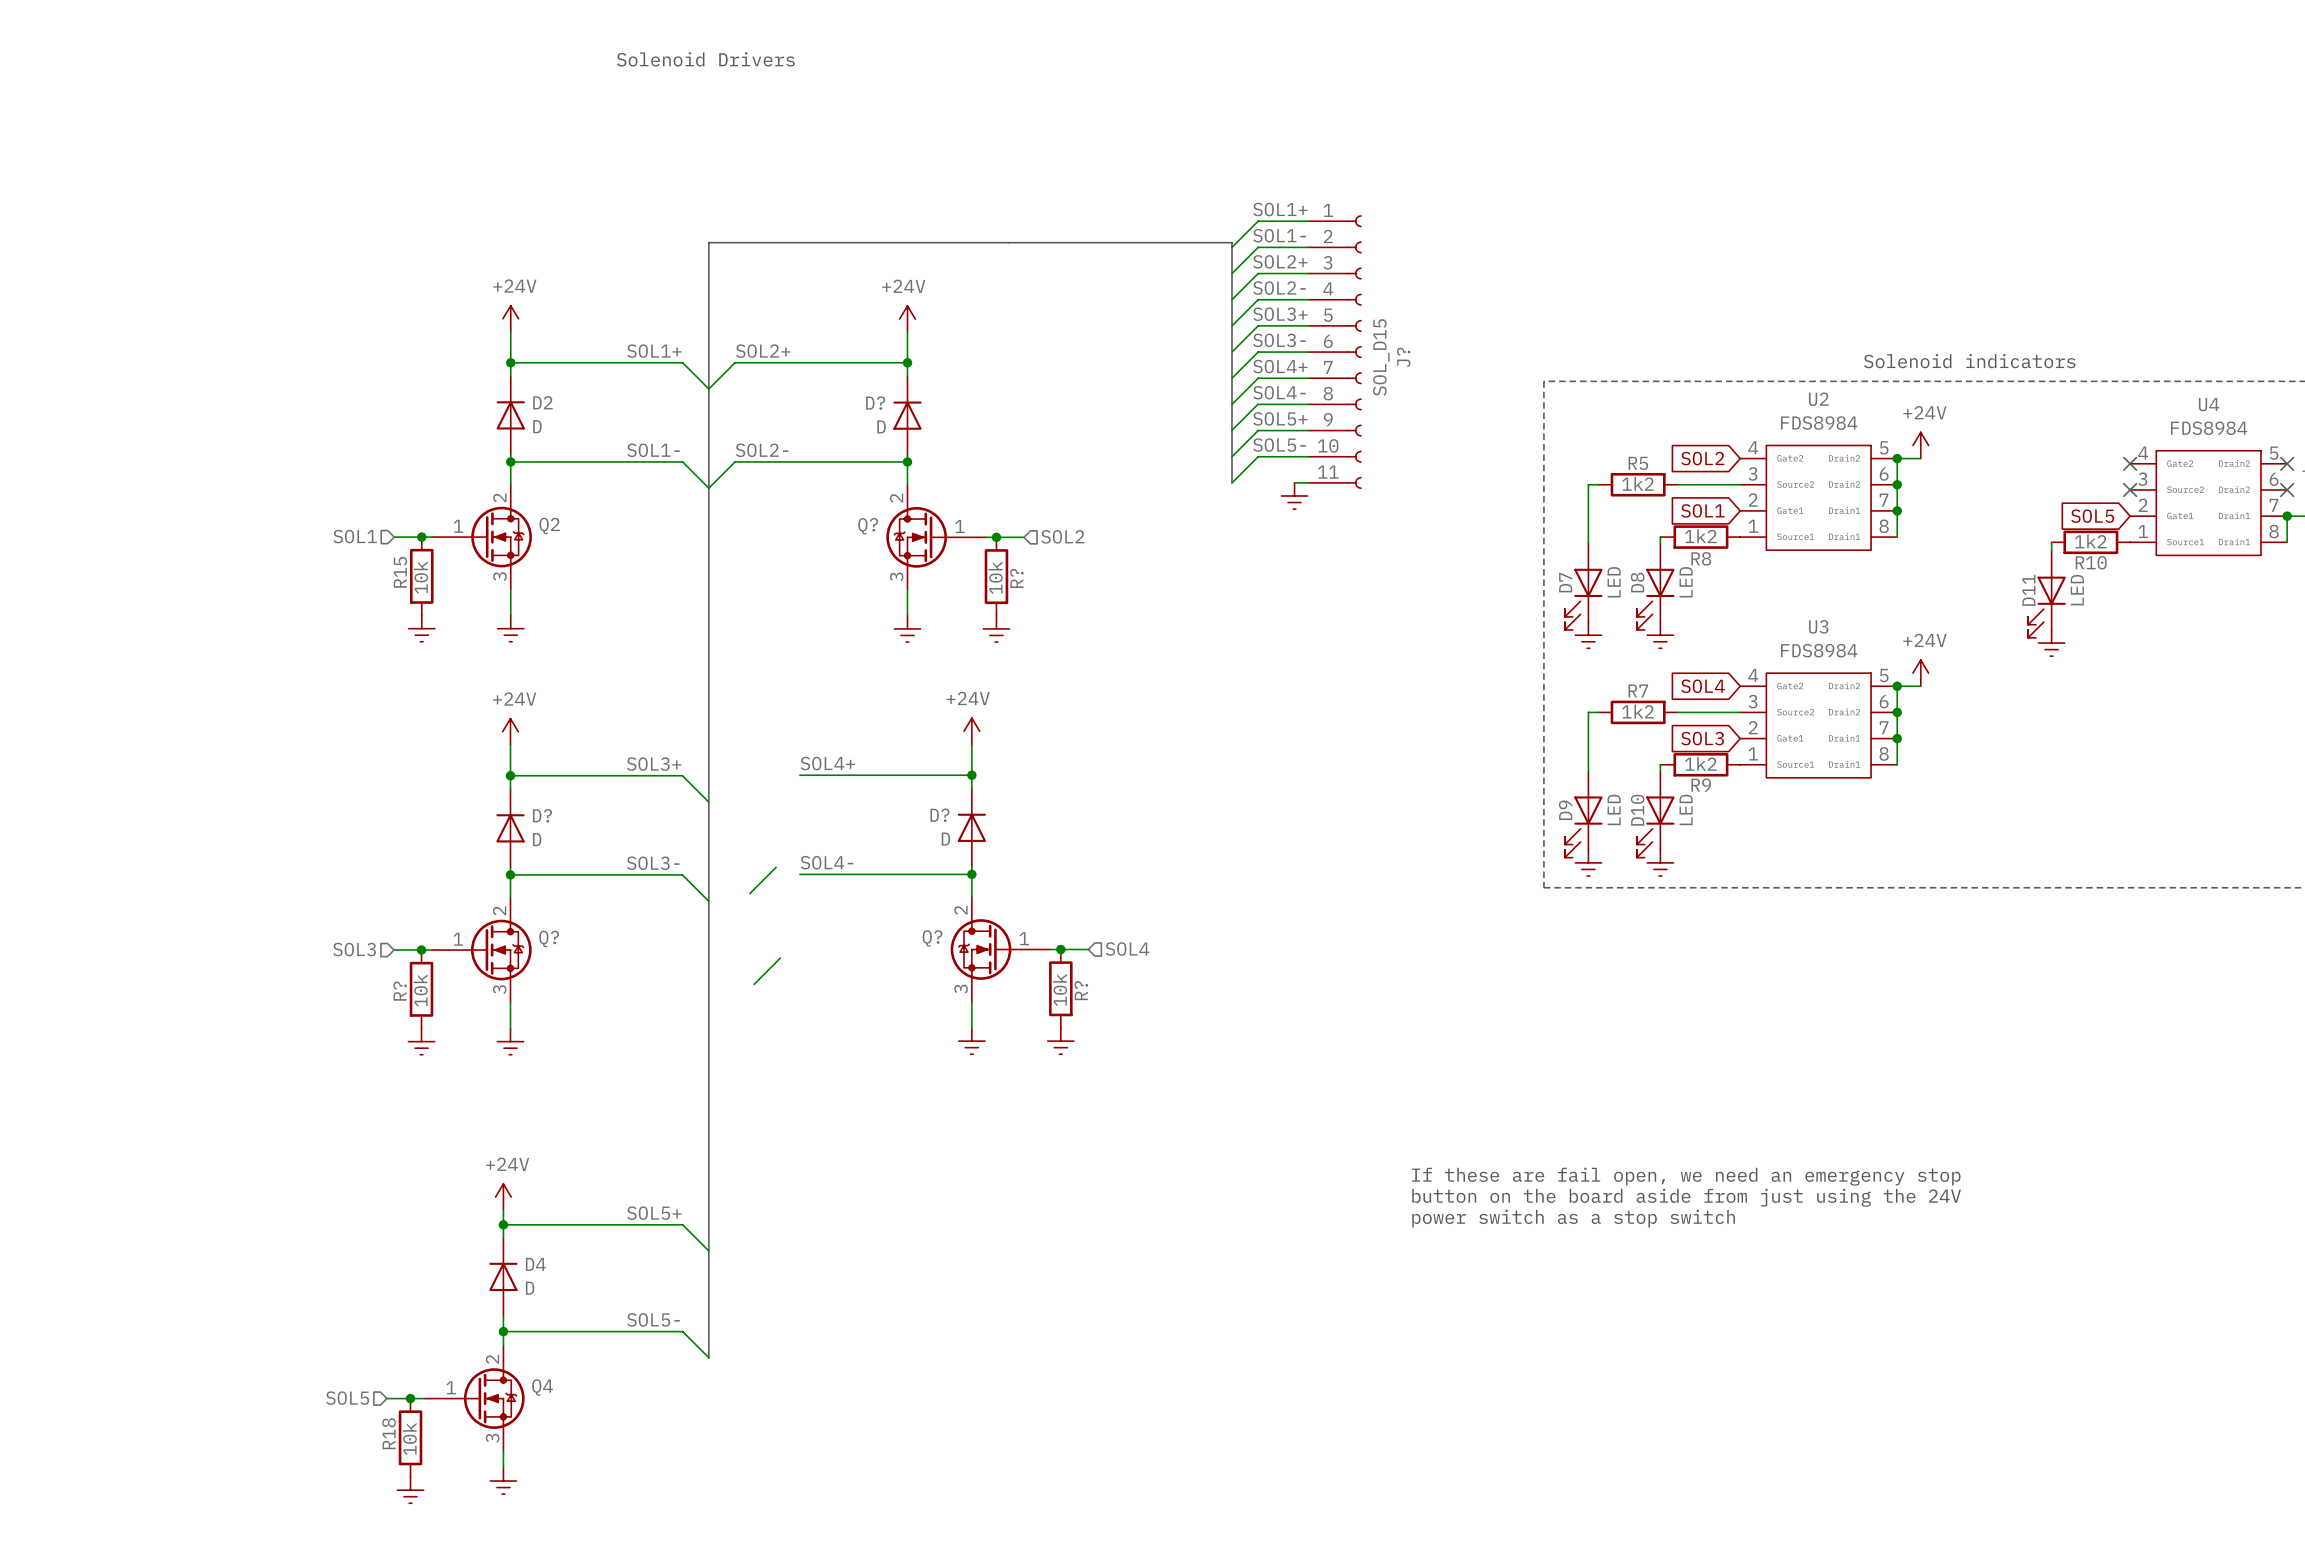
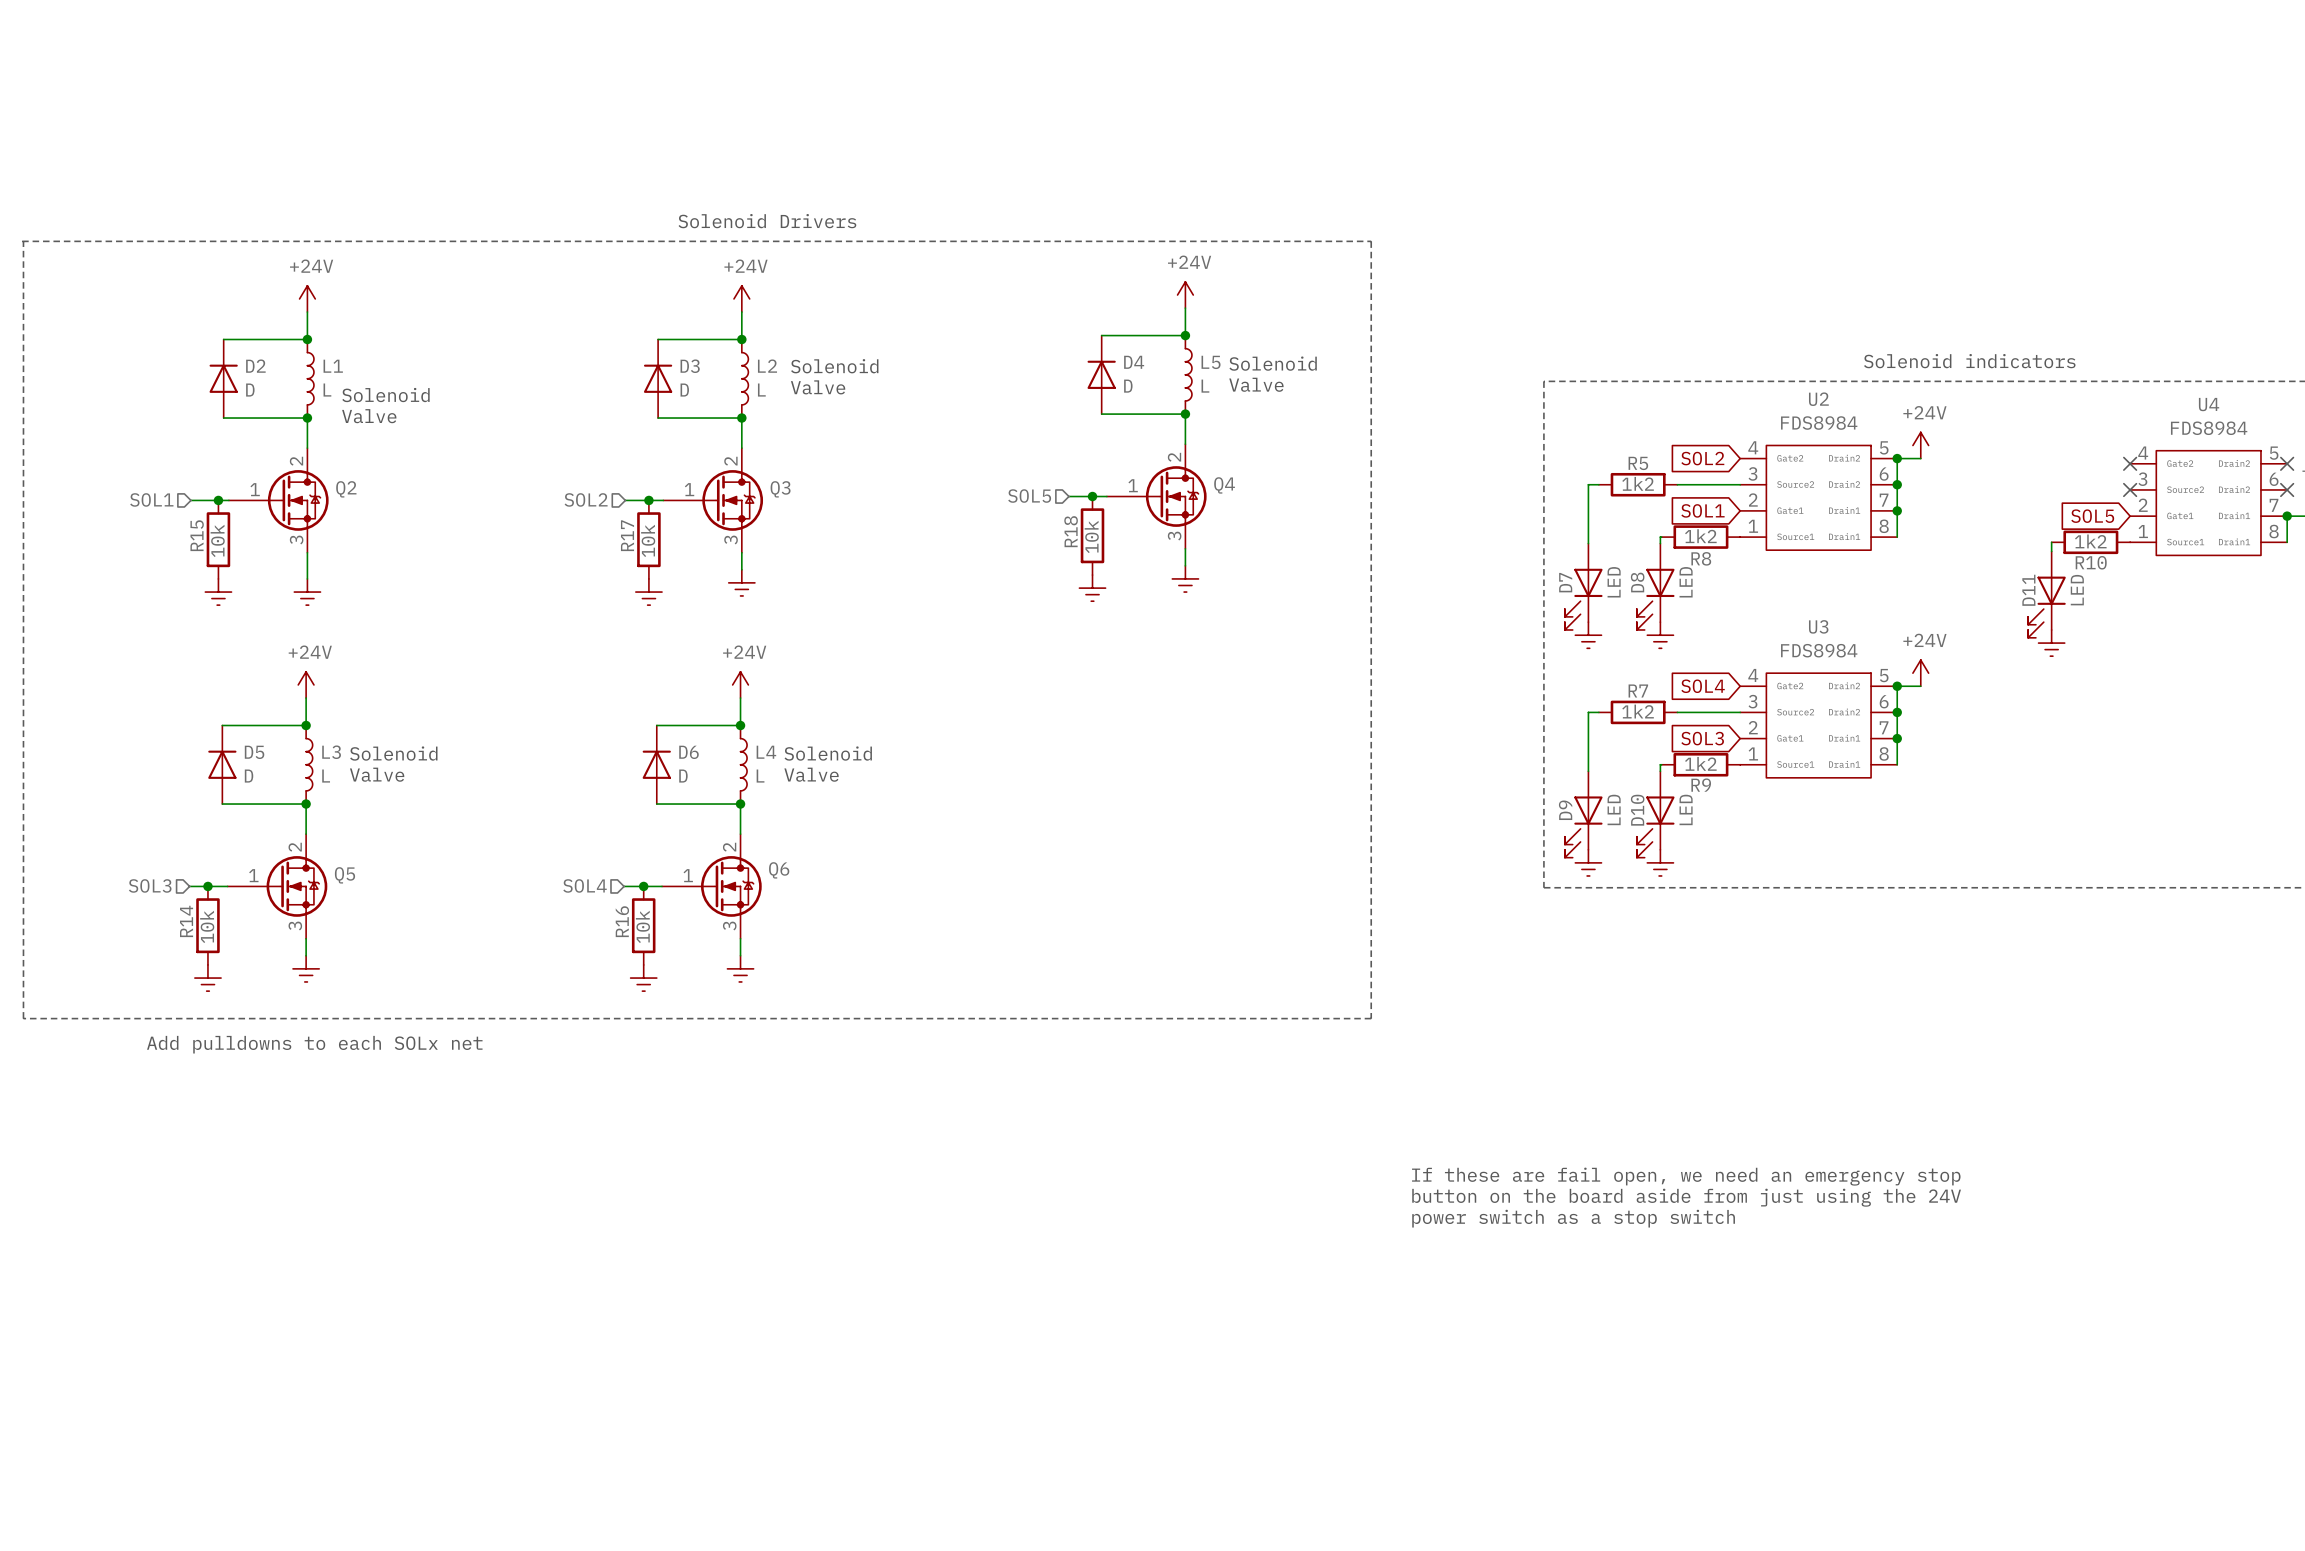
text position: Solenoid Drivers (705, 59) -> Solenoid Drivers (767, 221)
label: SOL1+ (1280, 209) -> none
wire: (1308, 221) (1258, 221) (1231, 247) -> none
label: SOL1- (1279, 235) -> none
line: none -> (22, 241) (1371, 241) (1371, 1018) (23, 1018) (23, 241)
bus: (1008, 242) (708, 242) (708, 1358) -> none
bus: (1009, 242) (1231, 242) (1231, 482) -> none
wire: (1308, 247) (1258, 247) (1231, 273) -> none
label: SOL2+ (1280, 261) -> none
wire: (1308, 273) (1258, 273) (1231, 299) -> none
label: SOL2- (1279, 288) -> none
power symbol: none -> +24V (1185, 295)
power symbol: none -> +24V (307, 298)
power symbol: none -> +24V (741, 298)
wire: (1308, 299) (1258, 299) (1231, 325) -> none
wire: none -> (1185, 308) (1185, 335) (1101, 335)
wire: none -> (307, 312) (307, 339) (223, 339)
wire: none -> (741, 312) (741, 339) (658, 339)
label: SOL3+ (1280, 314) -> none
power symbol: +24V (510, 318) -> none
power symbol: +24V (907, 319) -> none
wire: (1308, 325) (1258, 325) (1231, 352) -> none
wire: (510, 331) (510, 376) -> none
wire: (907, 332) (907, 376) -> none
junction: none -> (1185, 335)
junction: none -> (307, 339)
junction: none -> (741, 339)
label: SOL3- (1279, 340) -> none
label: SOL1+ (654, 351) -> none
label: SOL2+ (763, 351) -> none
wire: (1308, 352) (1258, 352) (1231, 378) -> none
J?: SOL_D15 (1335, 352) -> none
wire: (510, 362) (682, 362) (708, 388) (735, 362) (907, 362) -> none
junction: (510, 362) -> none
junction: (907, 362) -> none
text: none -> Solenoid (1273, 363)
text: none -> Solenoid (834, 366)
label: SOL4+ (1280, 366) -> none
L5: none -> L (1188, 374)
L1: none -> L (310, 378)
D3: none -> D (658, 378)
L2: none -> L (745, 378)
wire: (1308, 378) (1258, 378) (1231, 404) -> none
text: none -> Valve (1256, 384)
text: none -> Valve (818, 387)
label: SOL4- (1279, 392) -> none
text: none -> Solenoid (385, 395)
wire: (1308, 404) (1257, 404) (1231, 430) -> none
wire: none -> (1101, 414) (1185, 414) (1185, 444)
junction: none -> (1185, 414)
D2 position: (510, 415) -> (223, 378)
D?: D (907, 415) -> none
text: none -> Valve (369, 416)
wire: none -> (223, 418) (307, 418) (307, 448)
junction: none -> (307, 418)
wire: none -> (658, 418) (741, 418) (741, 448)
junction: none -> (741, 418)
label: SOL5+ (1280, 418) -> none
wire: (1308, 430) (1258, 430) (1231, 456) -> none
label: SOL5- (1279, 445) -> none
label: SOL1- (653, 450) -> none
label: SOL2- (762, 450) -> none
wire: (510, 454) (510, 484) -> none
wire: (907, 454) (907, 485) -> none
wire: (1308, 456) (1258, 456) (1231, 482) -> none
wire: (510, 461) (682, 461) (708, 488) (735, 461) (907, 461) -> none
junction: (510, 461) -> none
junction: (907, 461) -> none
wire: (1294, 482) (1308, 482) -> none
power symbol: (1294, 495) -> none
hierarchical label: none -> SOL5 (1029, 496)
junction: none -> (1092, 496)
hierarchical label: none -> SOL2 (586, 499)
junction: none -> (218, 500)
wire: none -> (625, 500) (663, 500)
junction: none -> (648, 500)
Q3: none -> (713, 500)
hierarchical label position: SOL1 (355, 536) -> SOL1 (151, 499)
hierarchical label: SOL2 (1062, 536) -> none
wire: (394, 537) (432, 537) -> (190, 500) (228, 500)
junction: (421, 537) -> none
Q2 position: (482, 537) -> (278, 500)
Q?: (936, 537) -> none
wire: (985, 537) (1023, 537) -> (1068, 496) (1106, 496)
junction: (996, 537) -> none
R17: none -> 10k (648, 539)
wire: none -> (1185, 548) (1185, 565)
wire: none -> (741, 552) (741, 569)
R15 position: (421, 576) -> (218, 539)
R?: 10k (996, 576) -> none
power symbol: none -> (1185, 578)
power symbol: none -> (741, 582)
power symbol: none -> (1092, 588)
wire: (510, 589) (510, 615) -> (307, 552) (307, 578)
wire: (907, 589) (907, 615) -> none
power symbol: none -> (218, 592)
power symbol: none -> (307, 592)
power symbol: none -> (648, 592)
power symbol: (421, 628) -> none
power symbol: (510, 628) -> none
power symbol: (907, 628) -> none
power symbol: (996, 628) -> none
power symbol: none -> +24V (306, 684)
power symbol: none -> +24V (740, 684)
wire: none -> (306, 698) (306, 725) (222, 725)
wire: none -> (740, 698) (740, 725) (656, 725)
junction: none -> (306, 725)
junction: none -> (740, 725)
power symbol: +24V (510, 731) -> none
power symbol: +24V (971, 731) -> none
wire: (510, 744) (510, 789) -> none
wire: (971, 744) (971, 788) -> none
text: none -> Solenoid (393, 753)
text: none -> Solenoid (828, 753)
label: SOL4+ (827, 763) -> none
D5: none -> D (222, 764)
L3: none -> L (309, 764)
label: SOL3+ (654, 764) -> none
D6: none -> D (656, 764)
L4: none -> L (743, 764)
text: none -> Valve (377, 774)
text: none -> Valve (811, 774)
wire: (510, 775) (682, 775) (708, 801) -> none
junction: (510, 775) -> none
wire: (799, 775) (971, 775) -> none
junction: (971, 775) -> none
wire: none -> (222, 804) (306, 804) (306, 834)
junction: none -> (306, 804)
wire: none -> (656, 804) (740, 804) (740, 834)
junction: none -> (740, 804)
D?: D (971, 827) -> none
D?: D (510, 828) -> none
label: SOL4- (827, 862) -> none
label: SOL3- (653, 863) -> none
wire: (510, 867) (510, 897) -> none
wire: (776, 867) (749, 893) -> none
wire: (971, 867) (971, 897) -> none
wire: (510, 874) (682, 874) (708, 901) -> none
junction: (510, 874) -> none
wire: (799, 874) (971, 874) -> none
junction: (971, 874) -> none
hierarchical label: none -> SOL4 (585, 885)
junction: none -> (207, 886)
Q5: none -> (277, 886)
wire: none -> (624, 886) (662, 886)
junction: none -> (643, 886)
Q6: none -> (711, 886)
R14: none -> 10k (207, 925)
R16: none -> 10k (643, 925)
wire: none -> (306, 938) (306, 955)
wire: none -> (740, 938) (740, 955)
hierarchical label position: SOL3 (354, 949) -> SOL3 (150, 885)
Q?: (1000, 949) -> none
wire: (1050, 949) (1088, 949) -> none
junction: (1060, 949) -> none
hierarchical label: SOL4 (1127, 949) -> none
wire: (394, 950) (431, 950) -> (189, 886) (227, 886)
junction: (421, 950) -> none
Q?: (481, 950) -> none
wire: (780, 958) (754, 984) -> none
power symbol: none -> (306, 968)
power symbol: none -> (740, 968)
power symbol: none -> (207, 978)
power symbol: none -> (643, 978)
R?: 10k (1060, 988) -> none
R?: 10k (421, 989) -> none
wire: (971, 1001) (971, 1028) -> none
wire: (510, 1002) (510, 1028) -> none
power symbol: (421, 1041) -> none
power symbol: (510, 1041) -> none
power symbol: (971, 1041) -> none
power symbol: (1060, 1041) -> none
text: none -> Add pulldowns to each SOLx net (314, 1044)
power symbol: +24V (503, 1197) -> none
wire: (503, 1210) (503, 1237) -> none
label: SOL5+ (654, 1213) -> none
wire: (503, 1224) (682, 1224) (708, 1250) -> none
junction: (503, 1224) -> none
D4 position: (503, 1276) -> (1101, 374)
wire: (503, 1316) (503, 1346) -> none
label: SOL5- (653, 1319) -> none
wire: (503, 1331) (682, 1331) (708, 1357) -> none
junction: (503, 1331) -> none
hierarchical label: SOL5 (347, 1398) -> none
wire: (386, 1398) (424, 1398) -> none
junction: (410, 1398) -> none
Q4 position: (474, 1398) -> (1156, 496)
R18 position: (410, 1437) -> (1092, 535)
wire: (503, 1450) (503, 1467) -> none
power symbol: (503, 1481) -> none
power symbol: (410, 1490) -> none

